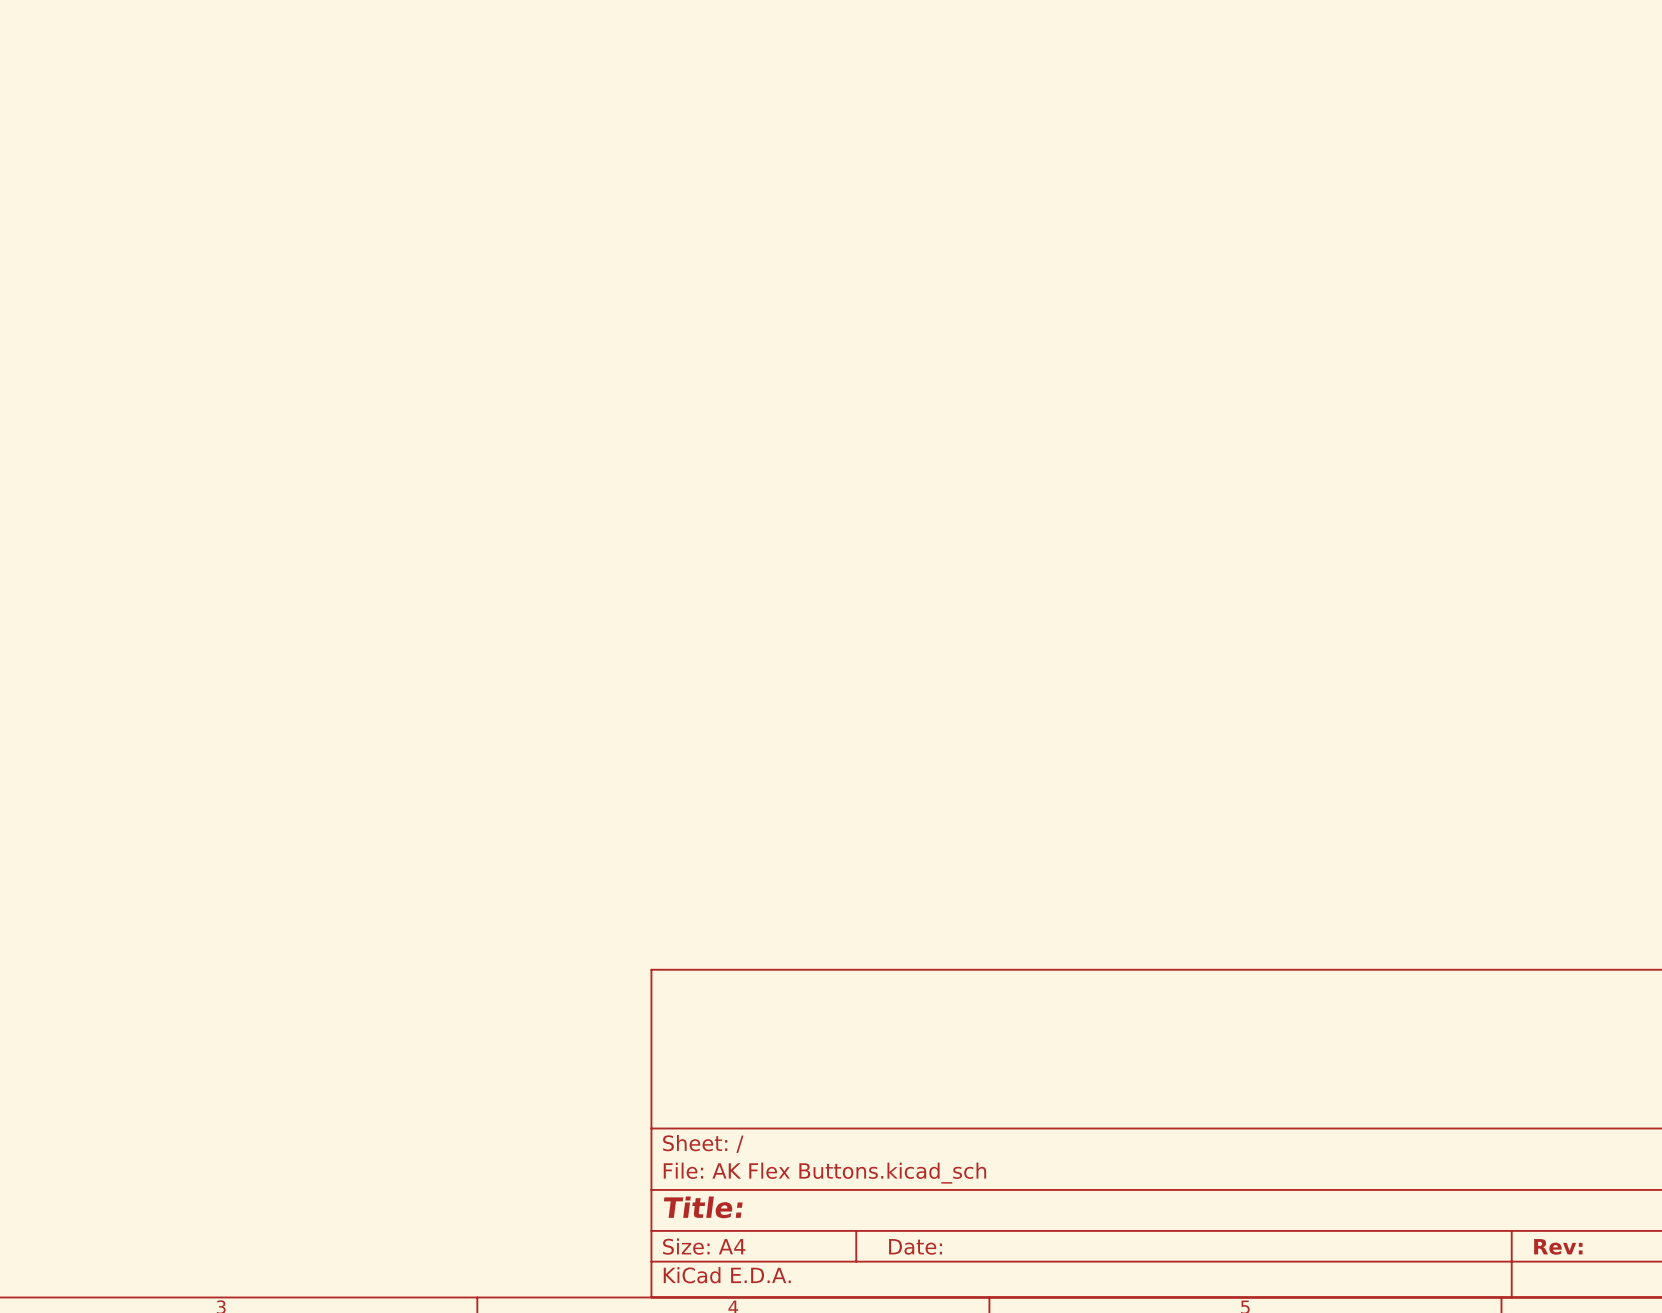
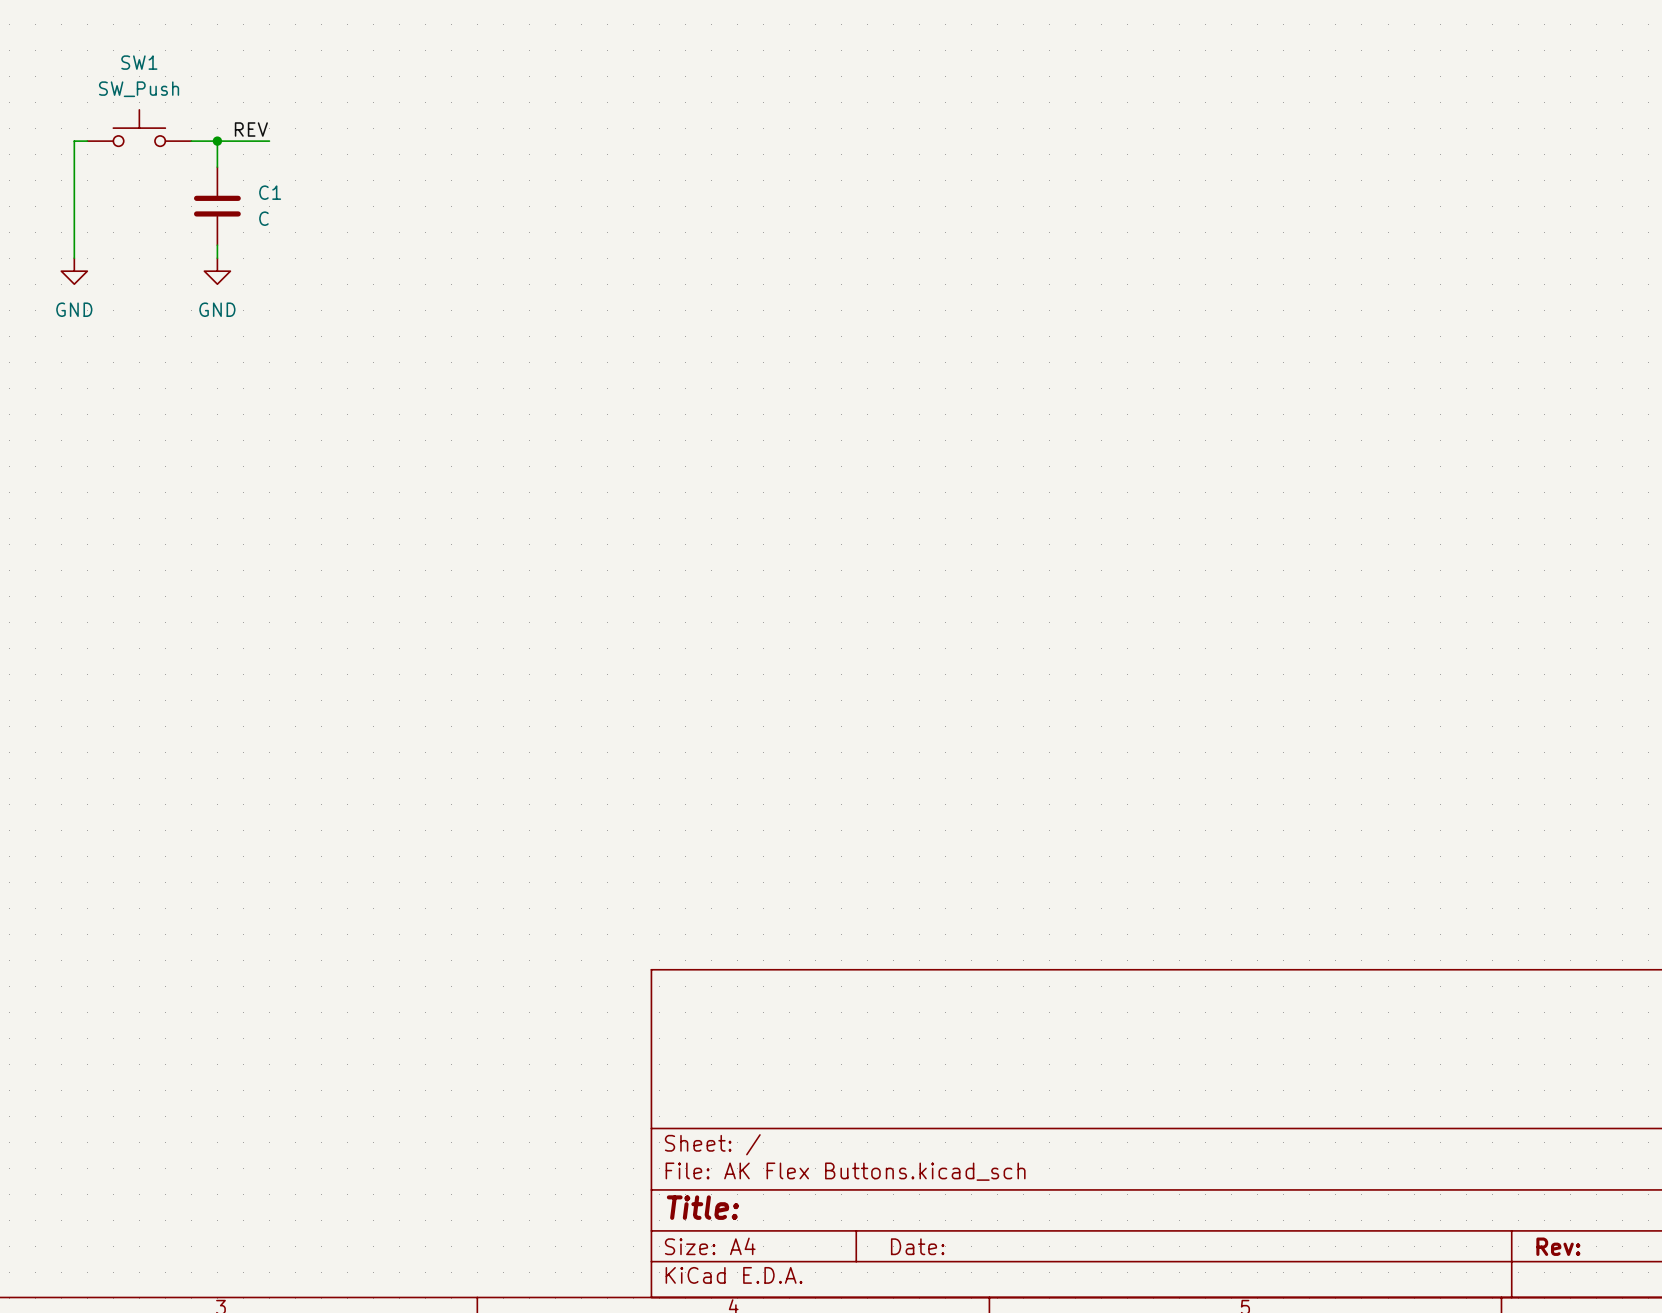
SW1: none -> SW_Push (139, 128)
label: none -> REV (251, 129)
wire: none -> (87, 141) (74, 141) (74, 258)
wire: none -> (191, 141) (269, 141)
wire: none -> (217, 141) (217, 167)
junction: none -> (217, 141)
C1: none -> C (217, 206)
wire: none -> (217, 245) (217, 258)
power symbol: none -> GND (74, 271)
power symbol: none -> GND (217, 271)

